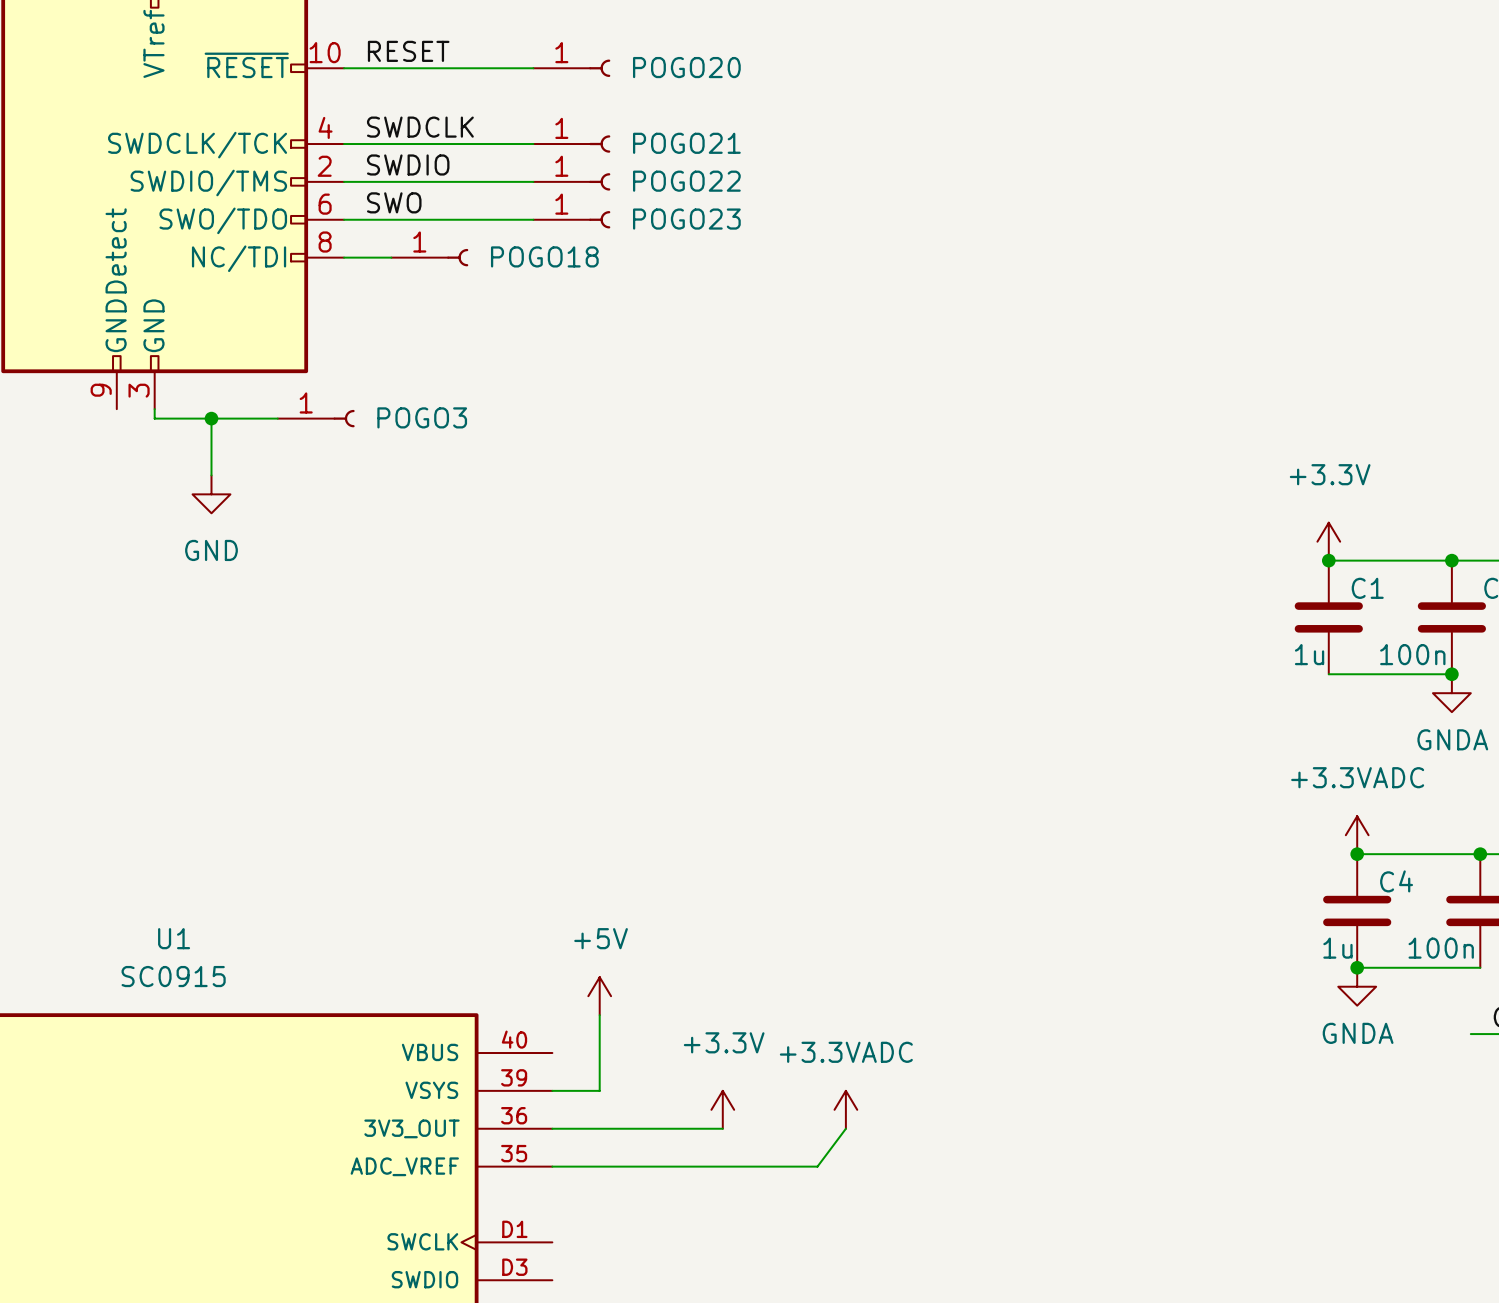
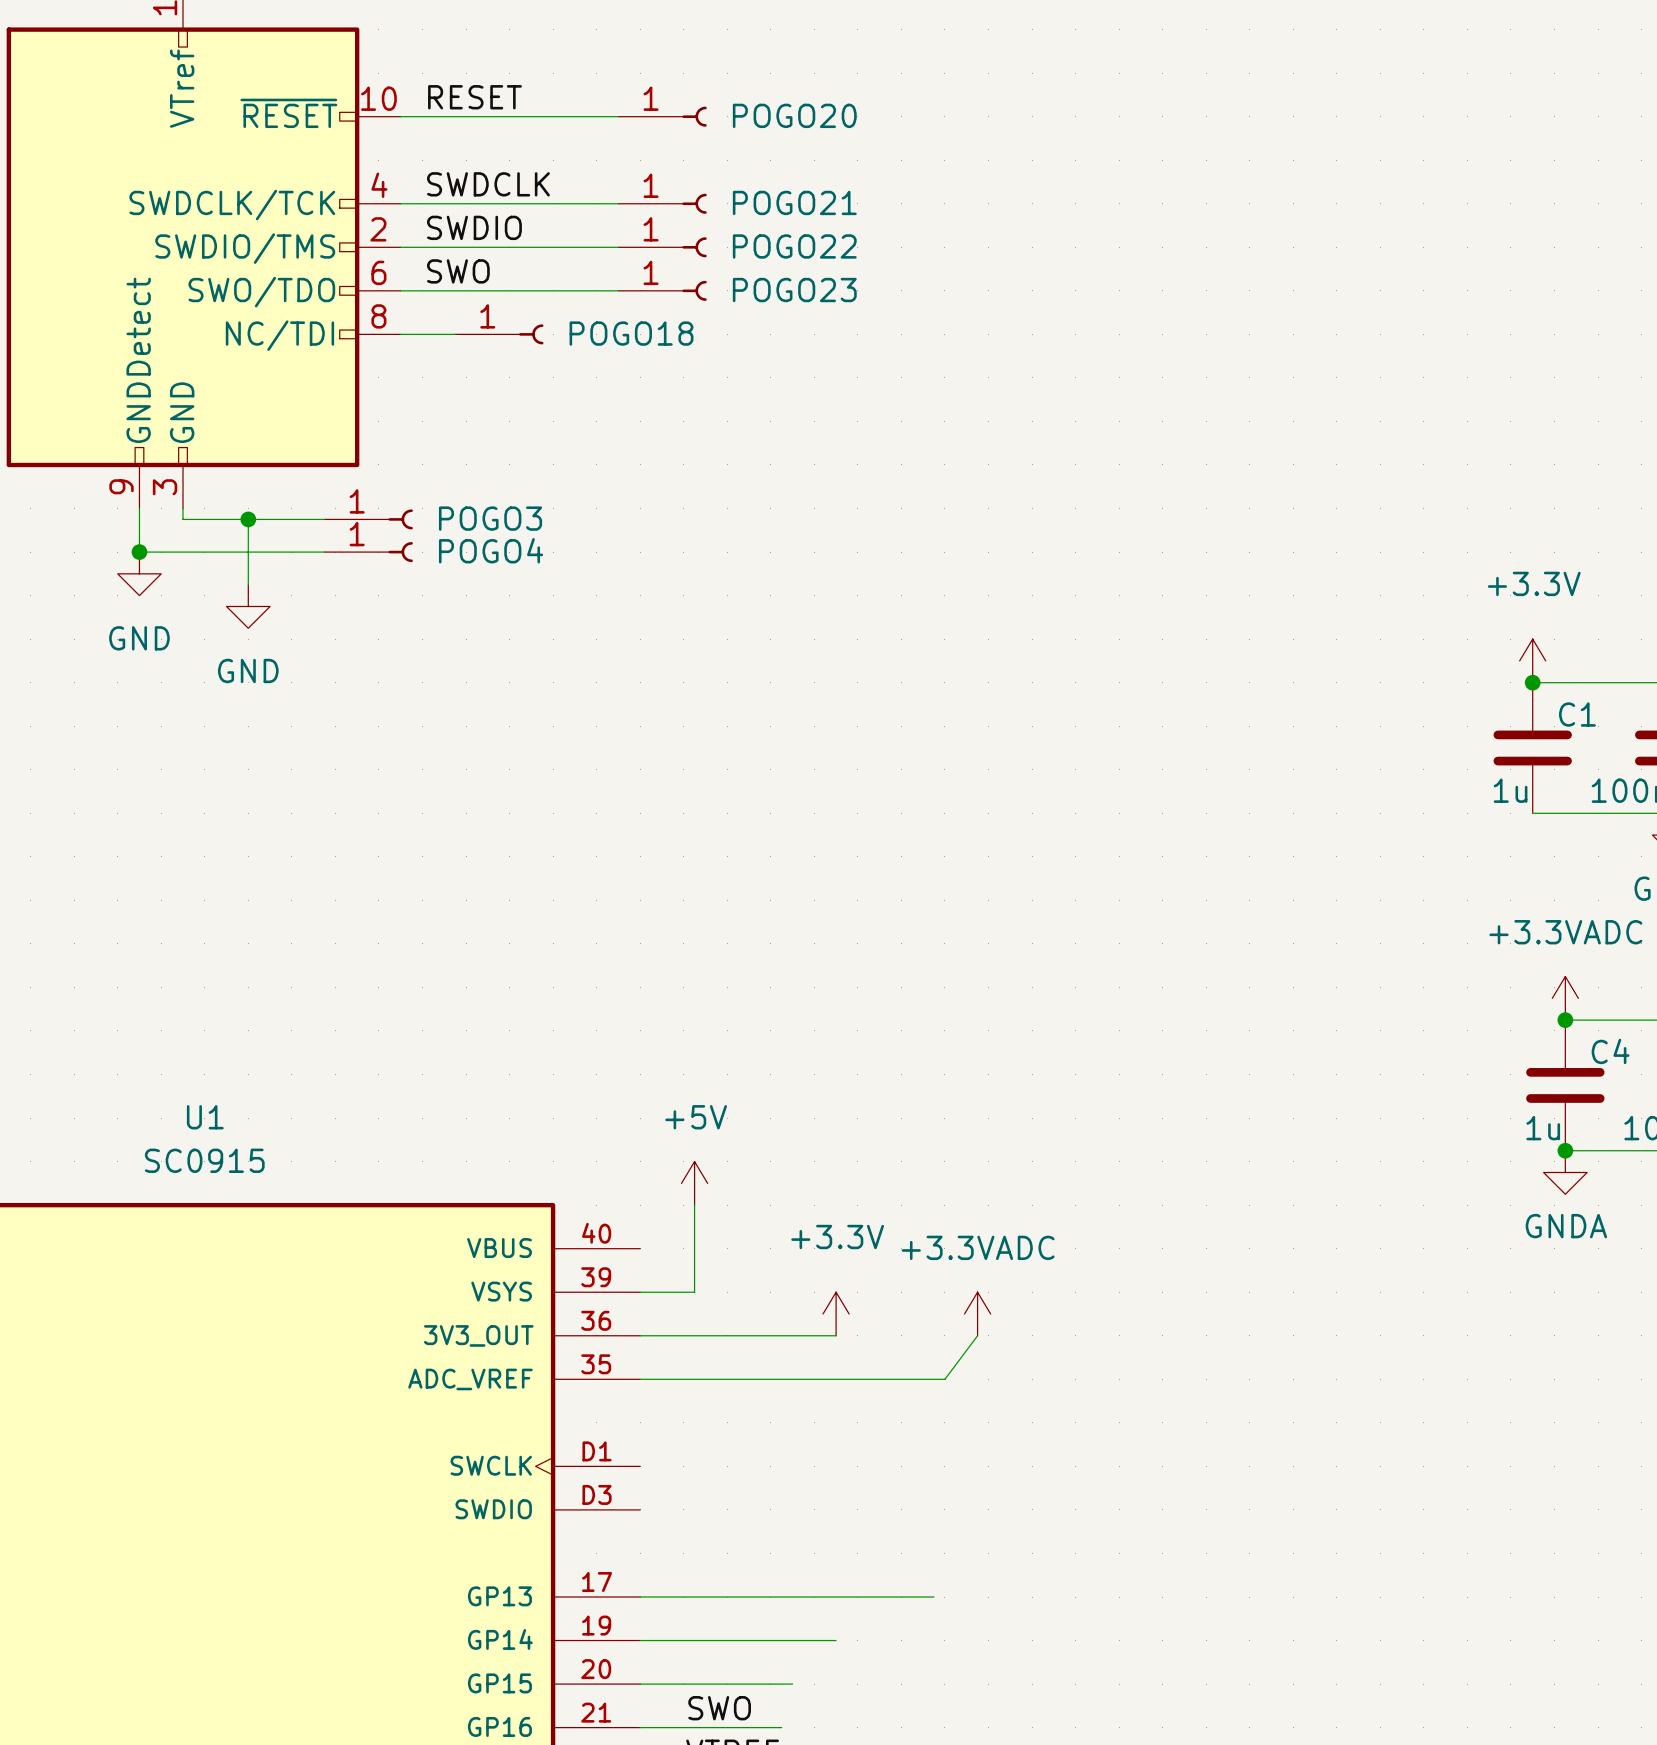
wire: none -> (139, 508) (139, 552) (324, 552)
junction: none -> (139, 552)
POGO4: none -> (368, 552)
power symbol: none -> GND (139, 573)

